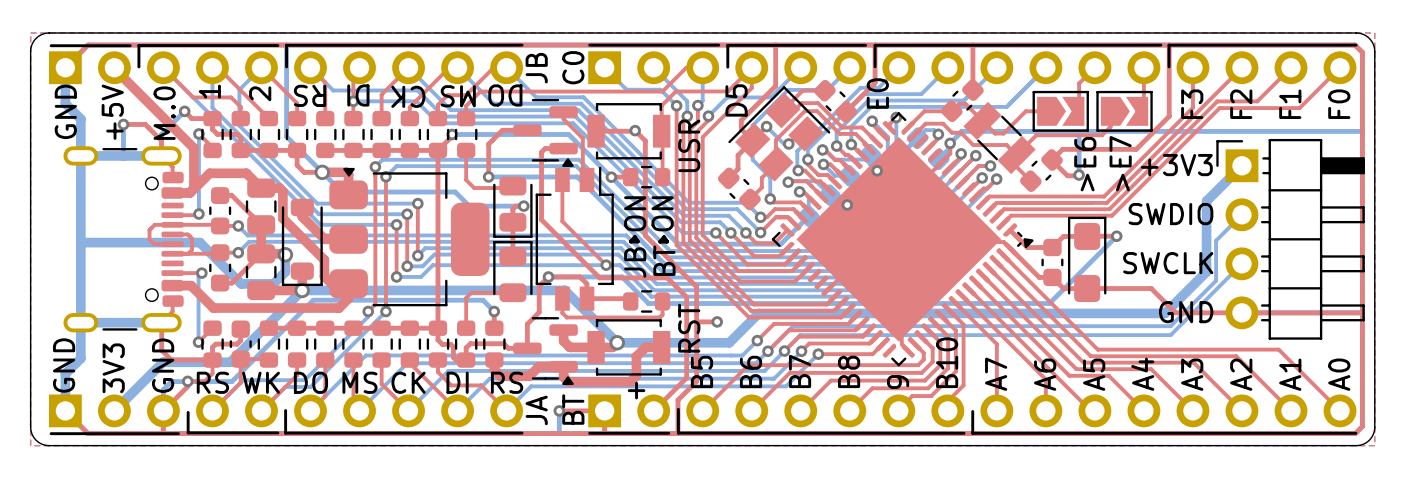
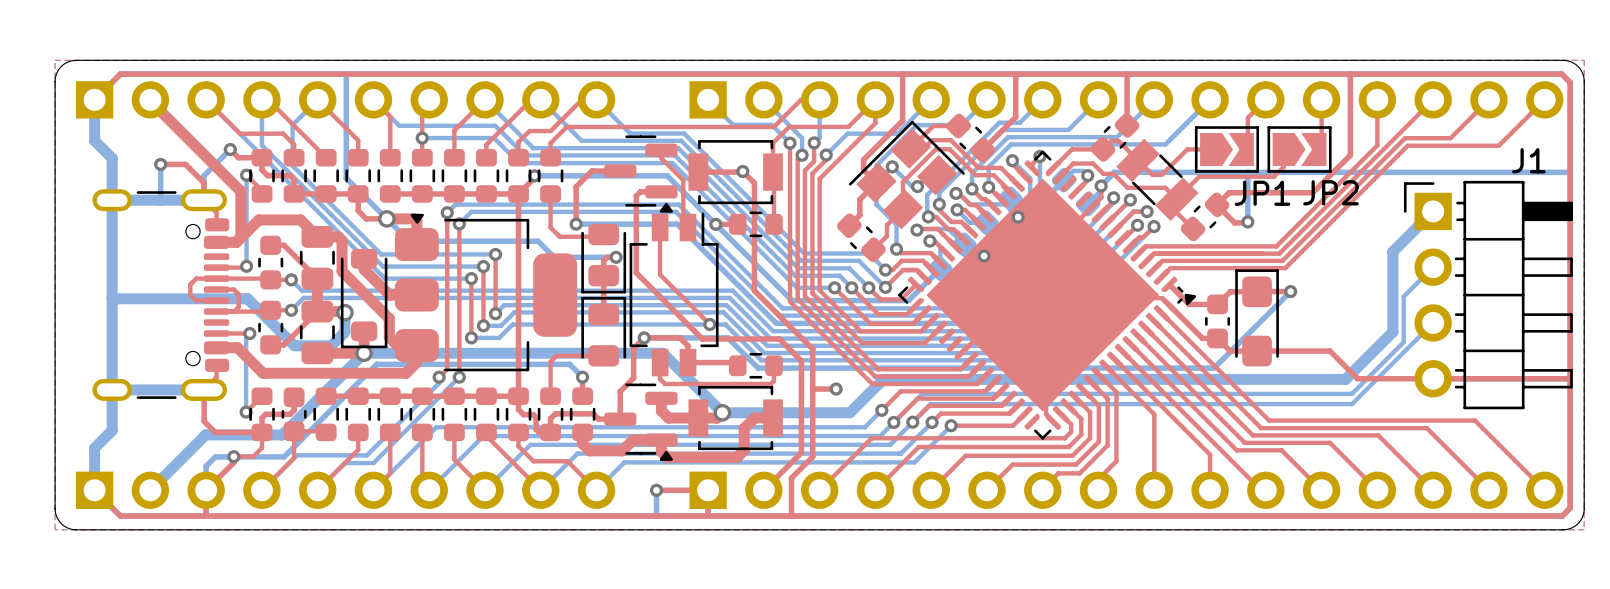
line: (51, 45) (130, 45) -> none
line: (277, 45) (138, 45) (138, 66) -> none
line: (522, 45) (286, 45) (286, 66) -> none
line: (589, 45) (718, 45) -> none
line: (865, 45) (727, 45) (727, 67) -> none
line: (1160, 45) (875, 45) (875, 66) -> none
line: (1356, 45) (1169, 45) (1169, 66) -> none
text: C0 (573, 67) -> none
text: JB (536, 68) -> none
text: 1 (209, 91) -> none
text: 2 (260, 93) -> none
text: E0 (877, 93) -> none
text: RS (310, 95) -> none
text: DI (358, 95) -> none
text: DO (505, 95) -> none
text: CK (408, 96) -> none
text: MS (458, 96) -> none
text: D5 (736, 100) -> none
text: F3 (1192, 104) -> none
text: F2 (1241, 104) -> none
text: F1 (1290, 104) -> none
text: F0 (1339, 104) -> none
text: GND (65, 111) -> none
text: +5V (112, 112) -> none
text: M..0 (164, 113) -> none
J1 name: none -> J1 (1528, 160)
text: USR (689, 145) -> none
JP1 name: none -> JP1 (1262, 193)
JP2 name: none -> JP2 (1330, 192)
text: >E7 (1120, 163) -> none
text: >E6 (1085, 164) -> none
text: +3V3 (1176, 165) -> none
text: ON (635, 213) -> none
text: ON (662, 213) -> none
text: SWDIO (1170, 214) -> none
line: (634, 237) (637, 241) (631, 241) (634, 237) -> none
line: (664, 237) (660, 241) (667, 241) (664, 237) -> none
text: BT (664, 260) -> none
text: JB (635, 262) -> none
text: SWCLK (1168, 263) -> none
text: GND (1186, 312) -> none
text: RST (689, 328) -> none
text: B10 (947, 362) -> none
text: GND (64, 365) -> none
text: GND (163, 365) -> none
text: 3V3 (113, 368) -> none
text: B5 (701, 371) -> none
text: B6 (751, 371) -> none
text: B7 (800, 371) -> none
text: B8 (849, 371) -> none
text: A7 (996, 374) -> none
text: A6 (1045, 374) -> none
text: A5 (1094, 374) -> none
text: A4 (1142, 374) -> none
text: A3 (1192, 374) -> none
text: A2 (1241, 374) -> none
text: A1 (1290, 374) -> none
text: A0 (1339, 374) -> none
text: RS (212, 382) -> none
text: WK (261, 382) -> none
text: DO (310, 382) -> none
text: MS (359, 382) -> none
text: CK (408, 382) -> none
text: DI (457, 382) -> none
text: RS (507, 382) -> none
text: 9 (898, 382) -> none
text: + (636, 390) -> none
text: BT (573, 409) -> none
line: (678, 409) (678, 433) (964, 433) -> none
line: (285, 410) (285, 433) (522, 433) -> none
text: JA (536, 410) -> none
line: (972, 411) (972, 433) (1355, 433) -> none
line: (188, 412) (188, 432) (277, 432) -> none
line: (51, 433) (178, 433) -> none
line: (589, 433) (668, 433) -> none

